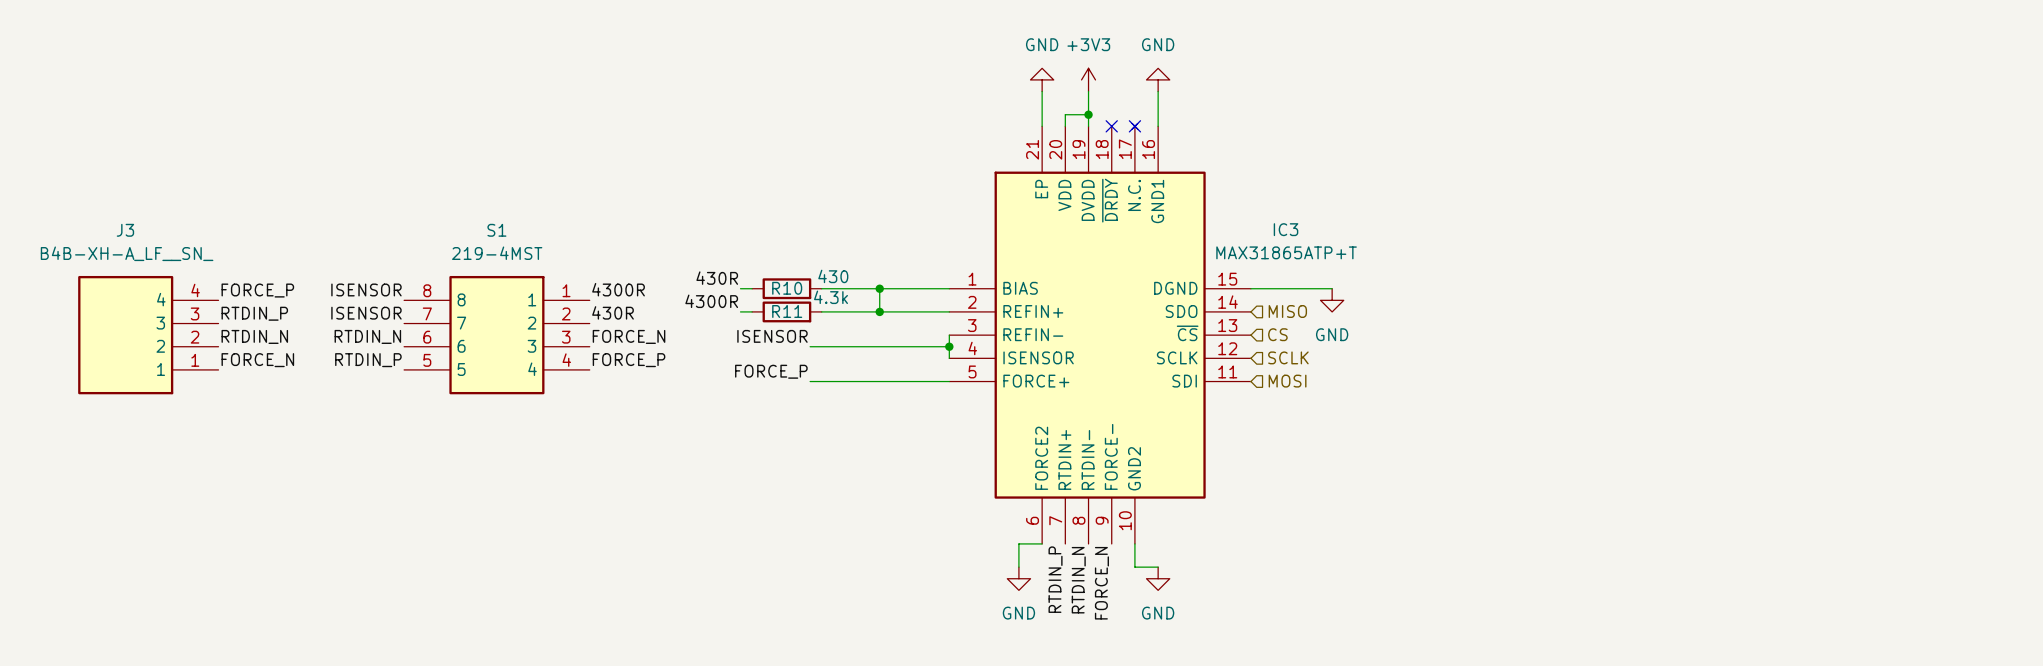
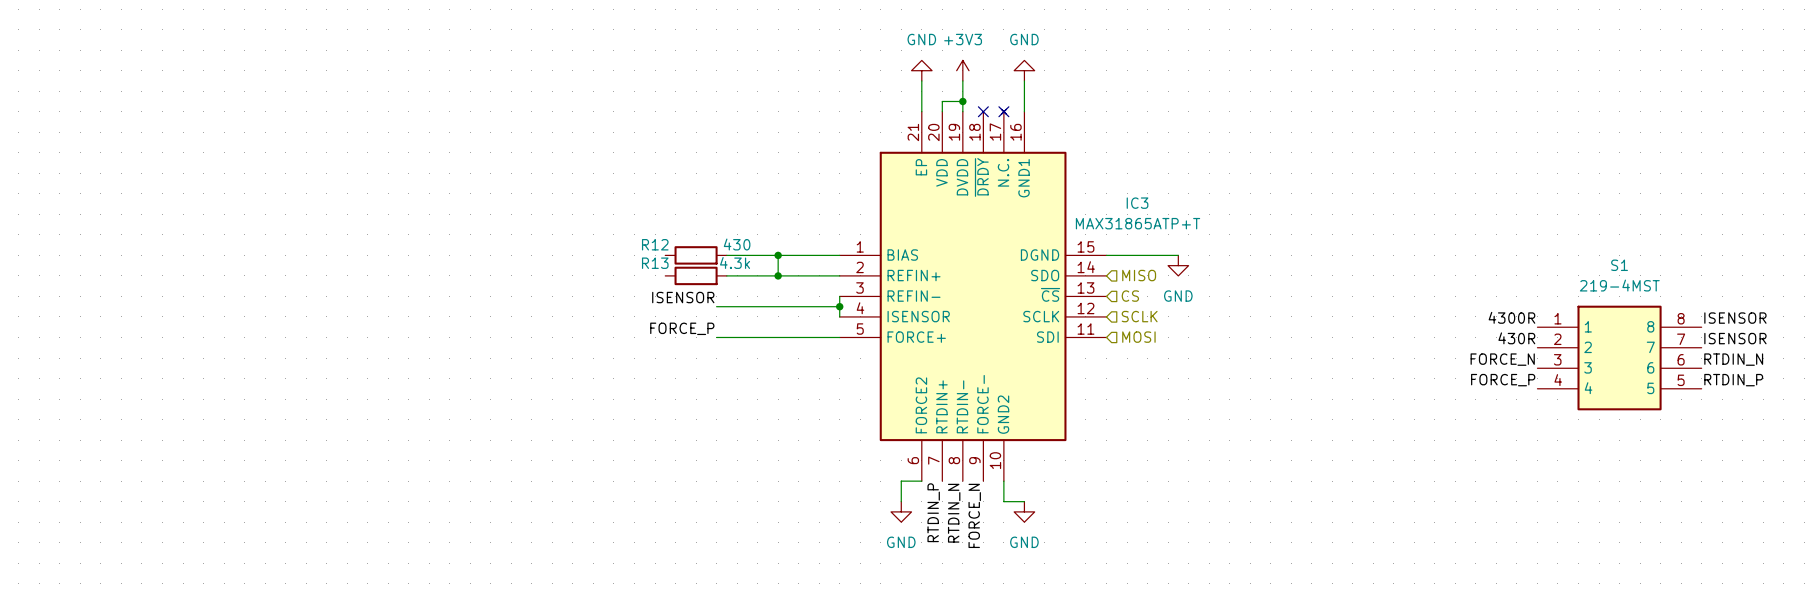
label: 430R (717, 278) -> none
wire: (740, 288) (752, 288) -> none
R10 name: R10 (787, 288) -> R12 (655, 244)
label: ISENSOR (366, 289) -> none
label: 4300R (618, 289) -> none
label: FORCE_P (257, 290) -> none
label: 4300R (711, 301) -> none
wire: (740, 311) (752, 311) -> none
R11 name: R11 (787, 311) -> R13 (655, 263)
label: 430R (613, 312) -> none
label: RTDIN_P (254, 313) -> none
label: ISENSOR (366, 313) -> none
J3: B4B-XH-A_LF__SN_ (148, 335) -> none
S1 flip: as is (496, 335) -> left-right (1619, 358)
S1 position: (496, 335) -> (1619, 358)
label: RTDIN_N (254, 336) -> none
label: RTDIN_N (367, 336) -> none
label: FORCE_N (629, 336) -> none
label: none -> 4300R (1511, 317)
label: none -> ISENSOR (1735, 318)
label: FORCE_N (257, 360) -> none
label: RTDIN_P (368, 360) -> none
label: FORCE_P (629, 360) -> none
label: none -> 430R (1516, 338)
label: none -> ISENSOR (1735, 338)
label: none -> FORCE_N (1502, 359)
label: none -> RTDIN_N (1733, 359)
label: none -> FORCE_P (1503, 380)
label: none -> RTDIN_P (1733, 380)

